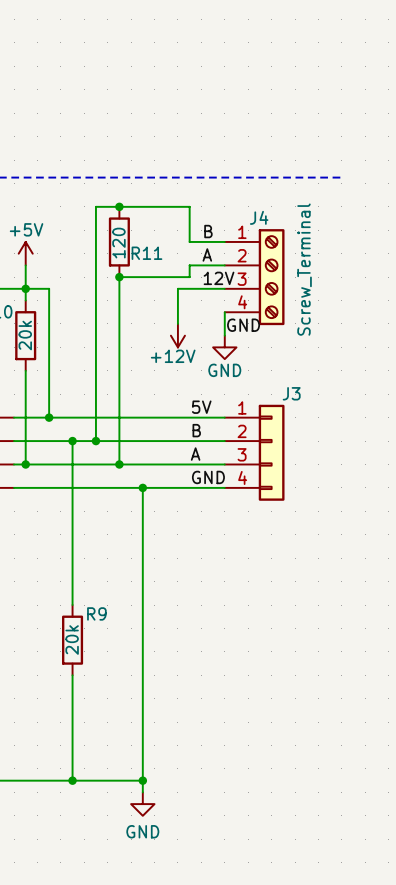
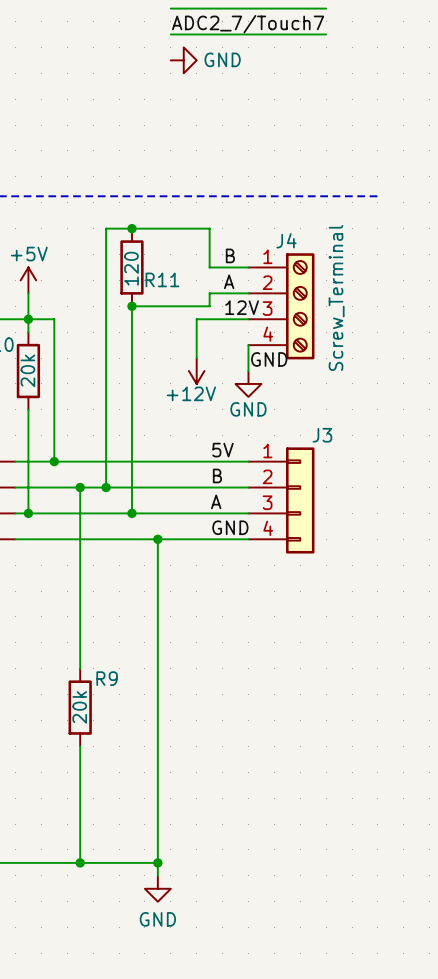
wire: none -> (170, 8) (326, 8)
label: none -> ADC2_7/Touch7 (248, 24)
wire: none -> (170, 34) (326, 34)
power symbol: none -> GND (183, 60)

